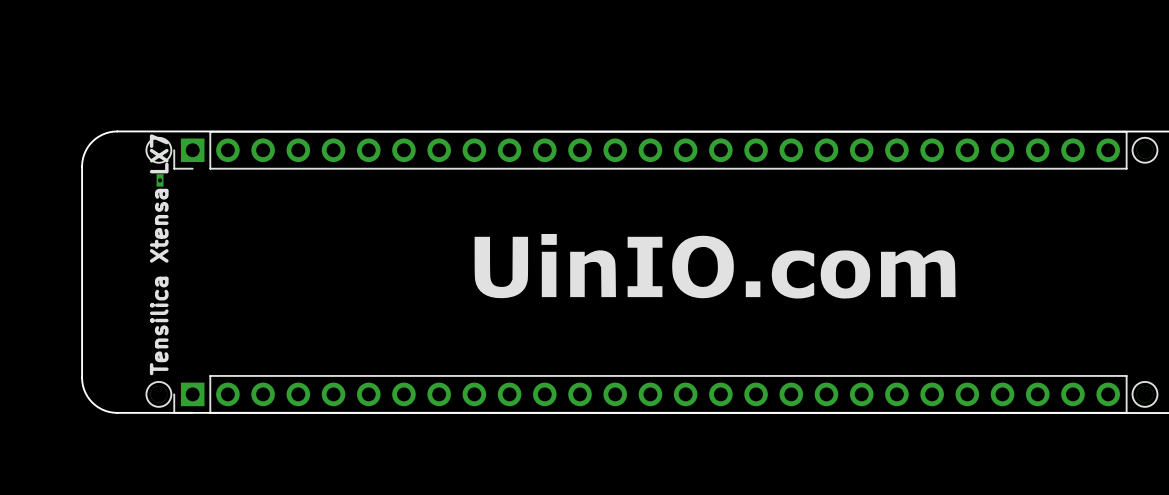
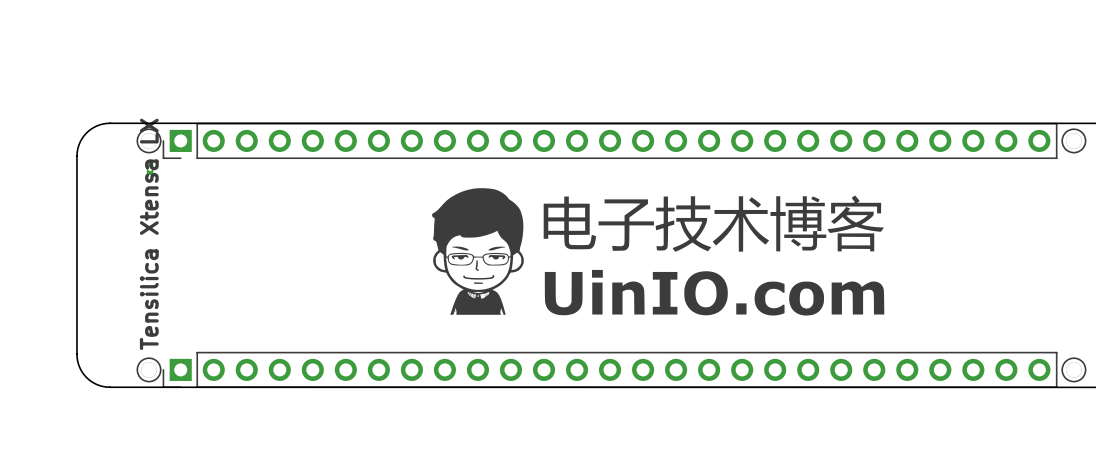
drawing shape: [474, 233, 956, 299] -> [432, 188, 885, 316]
text: Tensilica Xtensa LX7 (159, 254) -> Tensilica Xtensa LX (149, 234)

